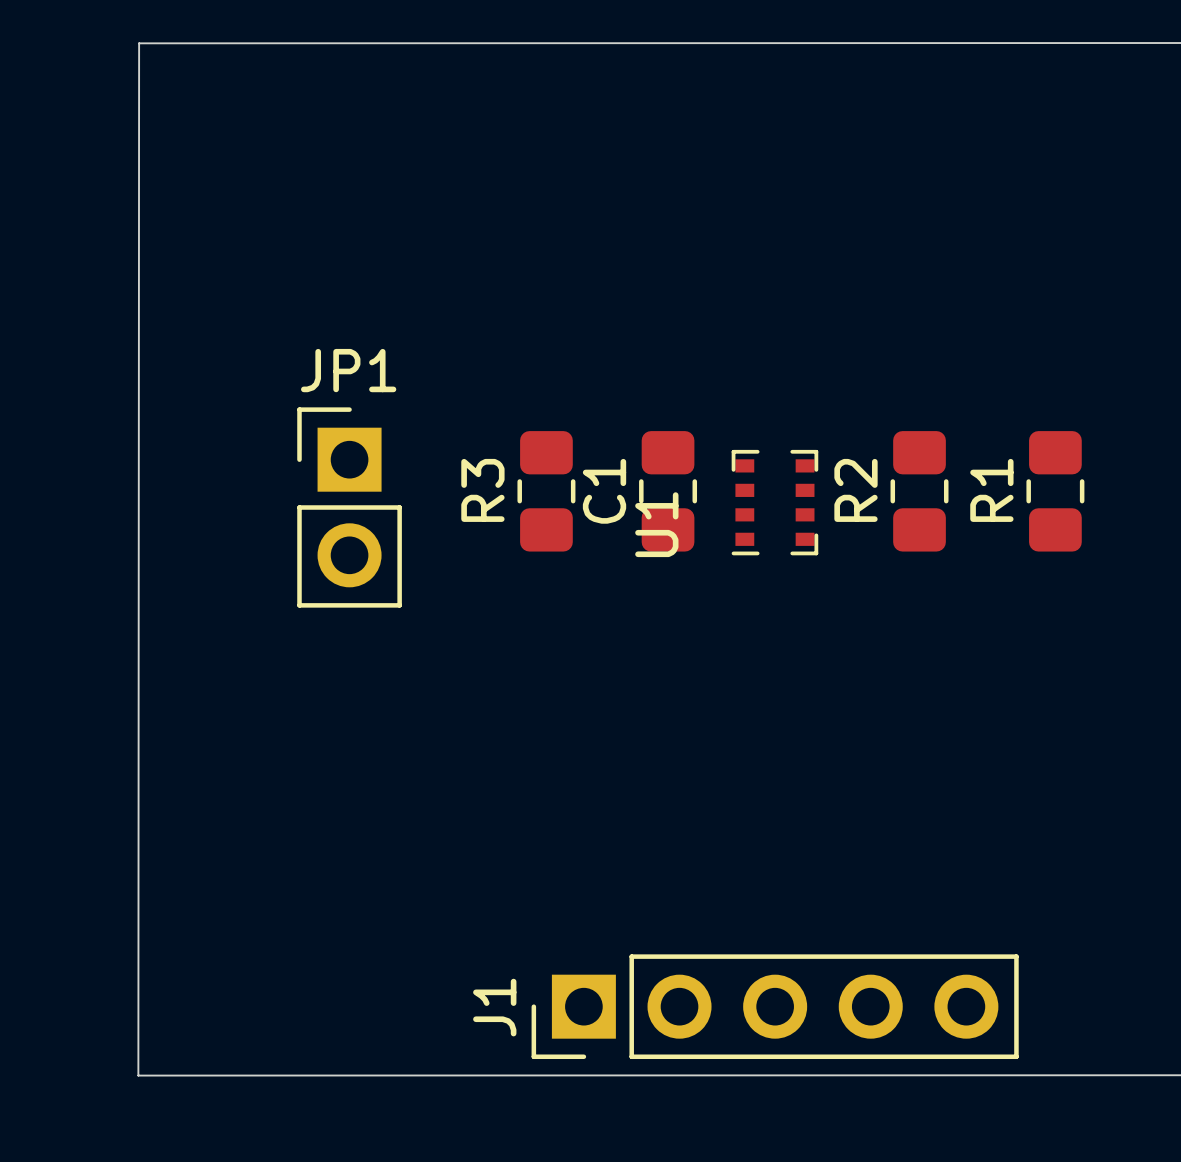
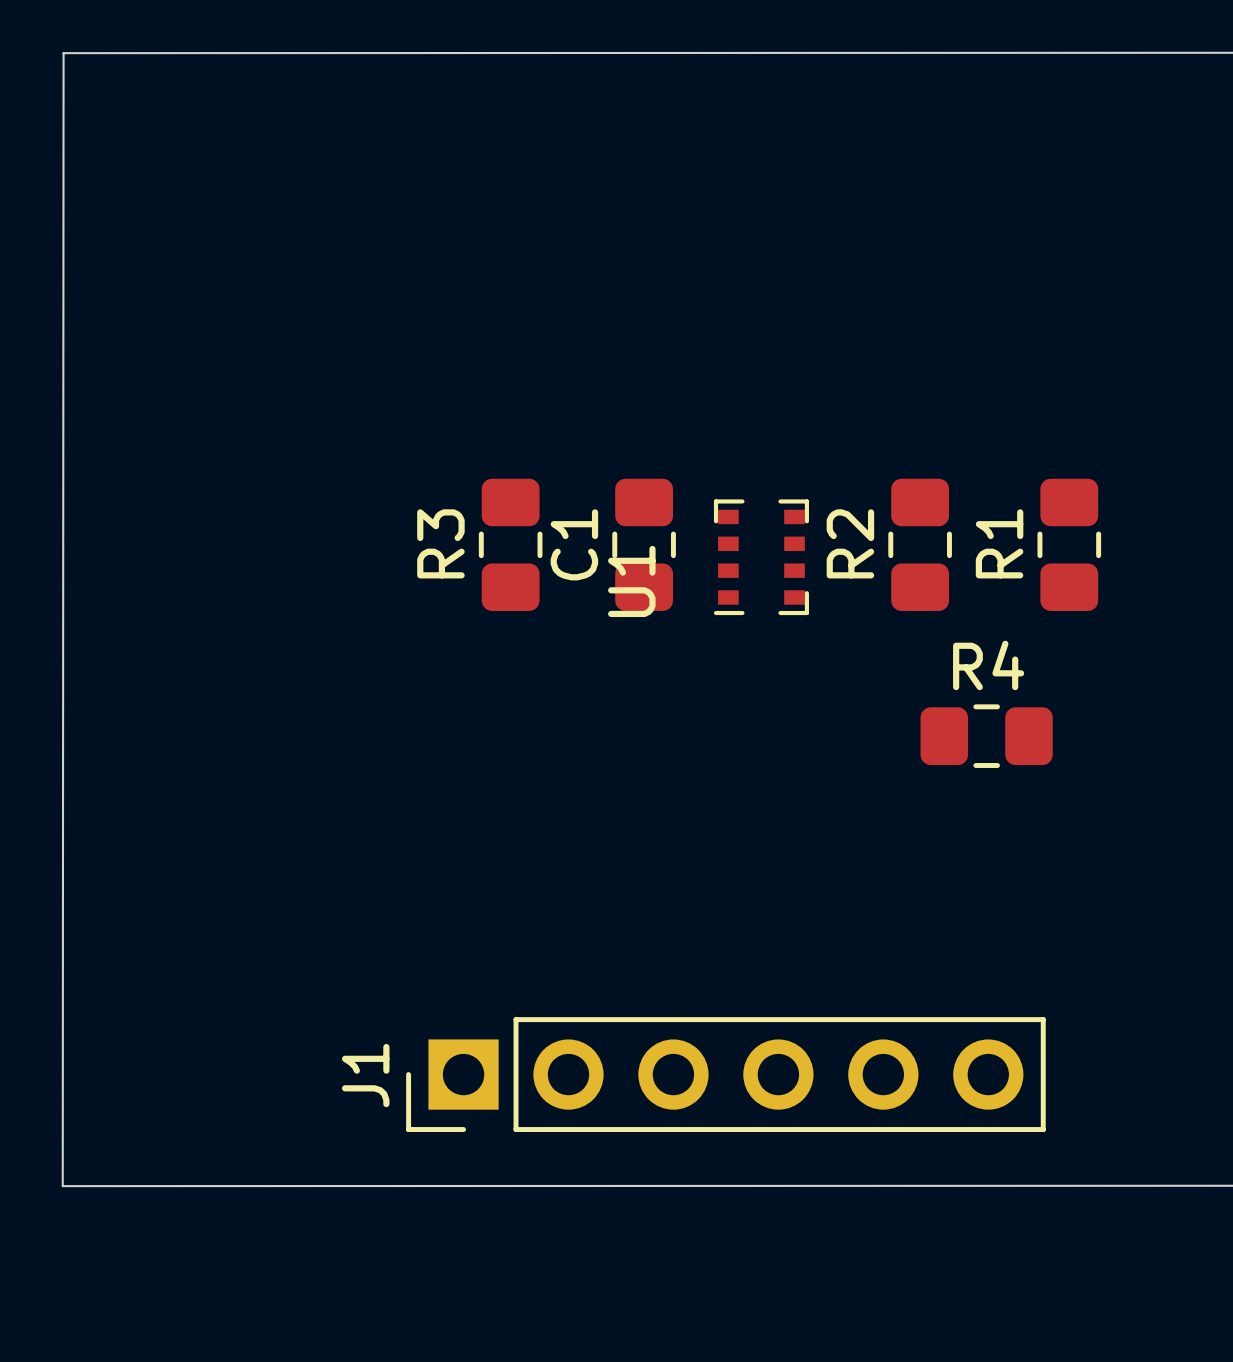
JP1: (349, 507) -> none
R4: none -> (986, 736)
J1 footprint: [531, 954, 1019, 1060] -> [406, 1017, 1046, 1132]

